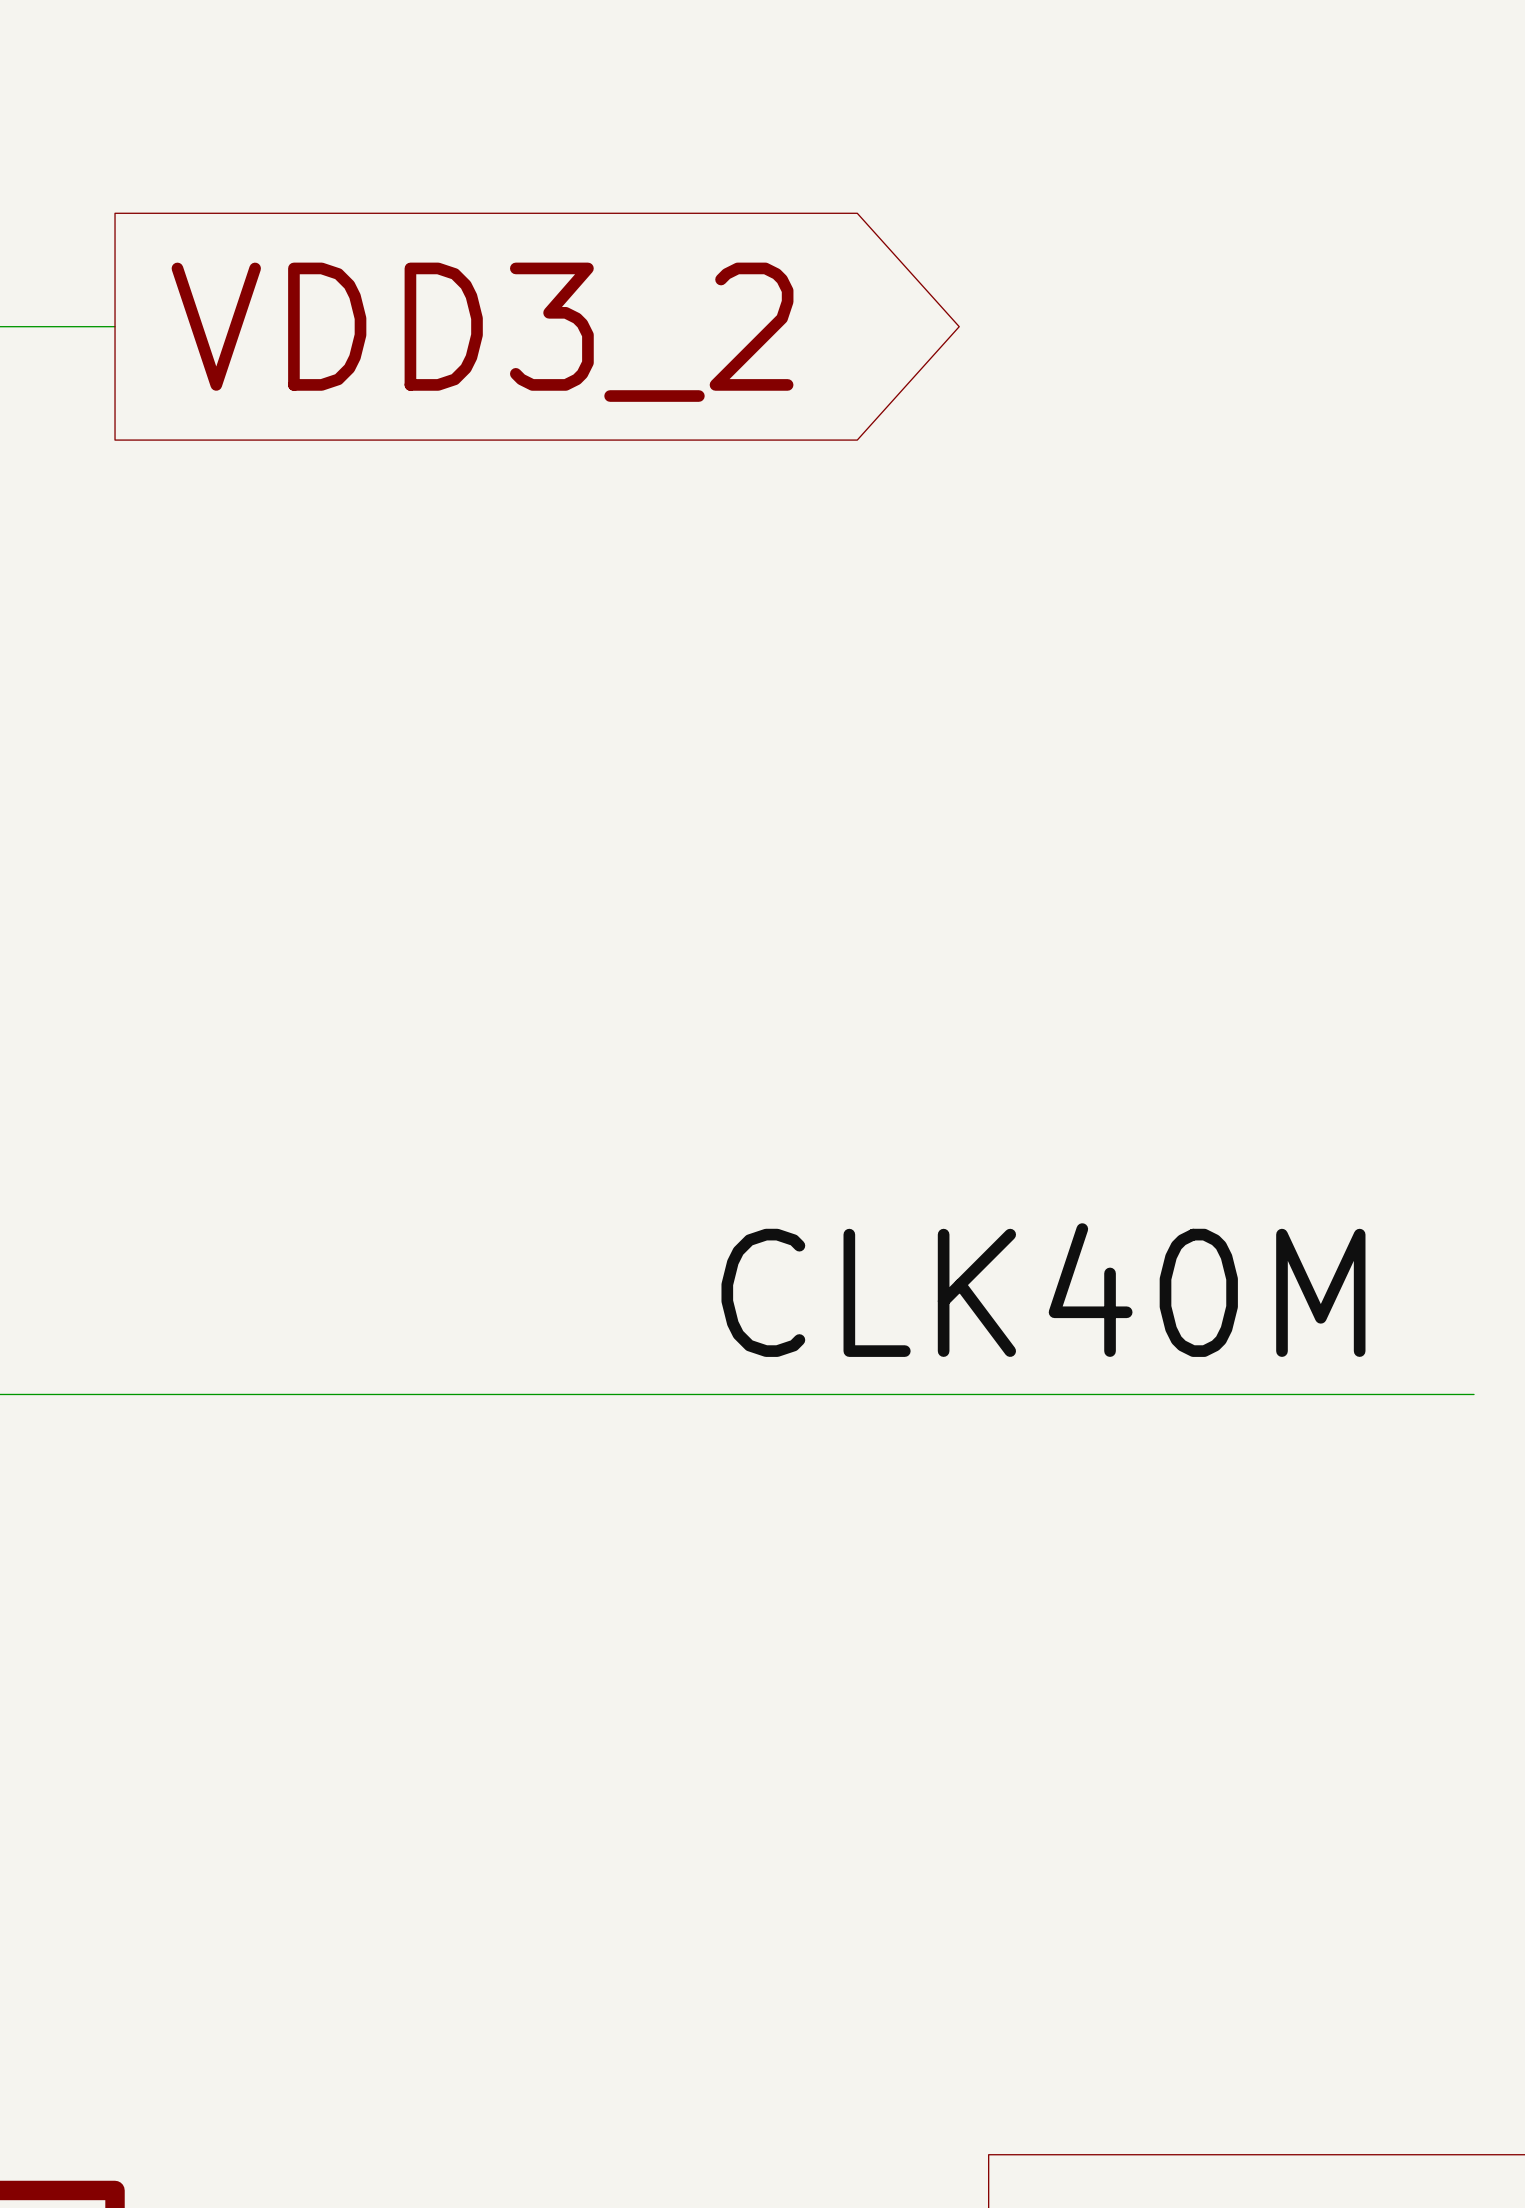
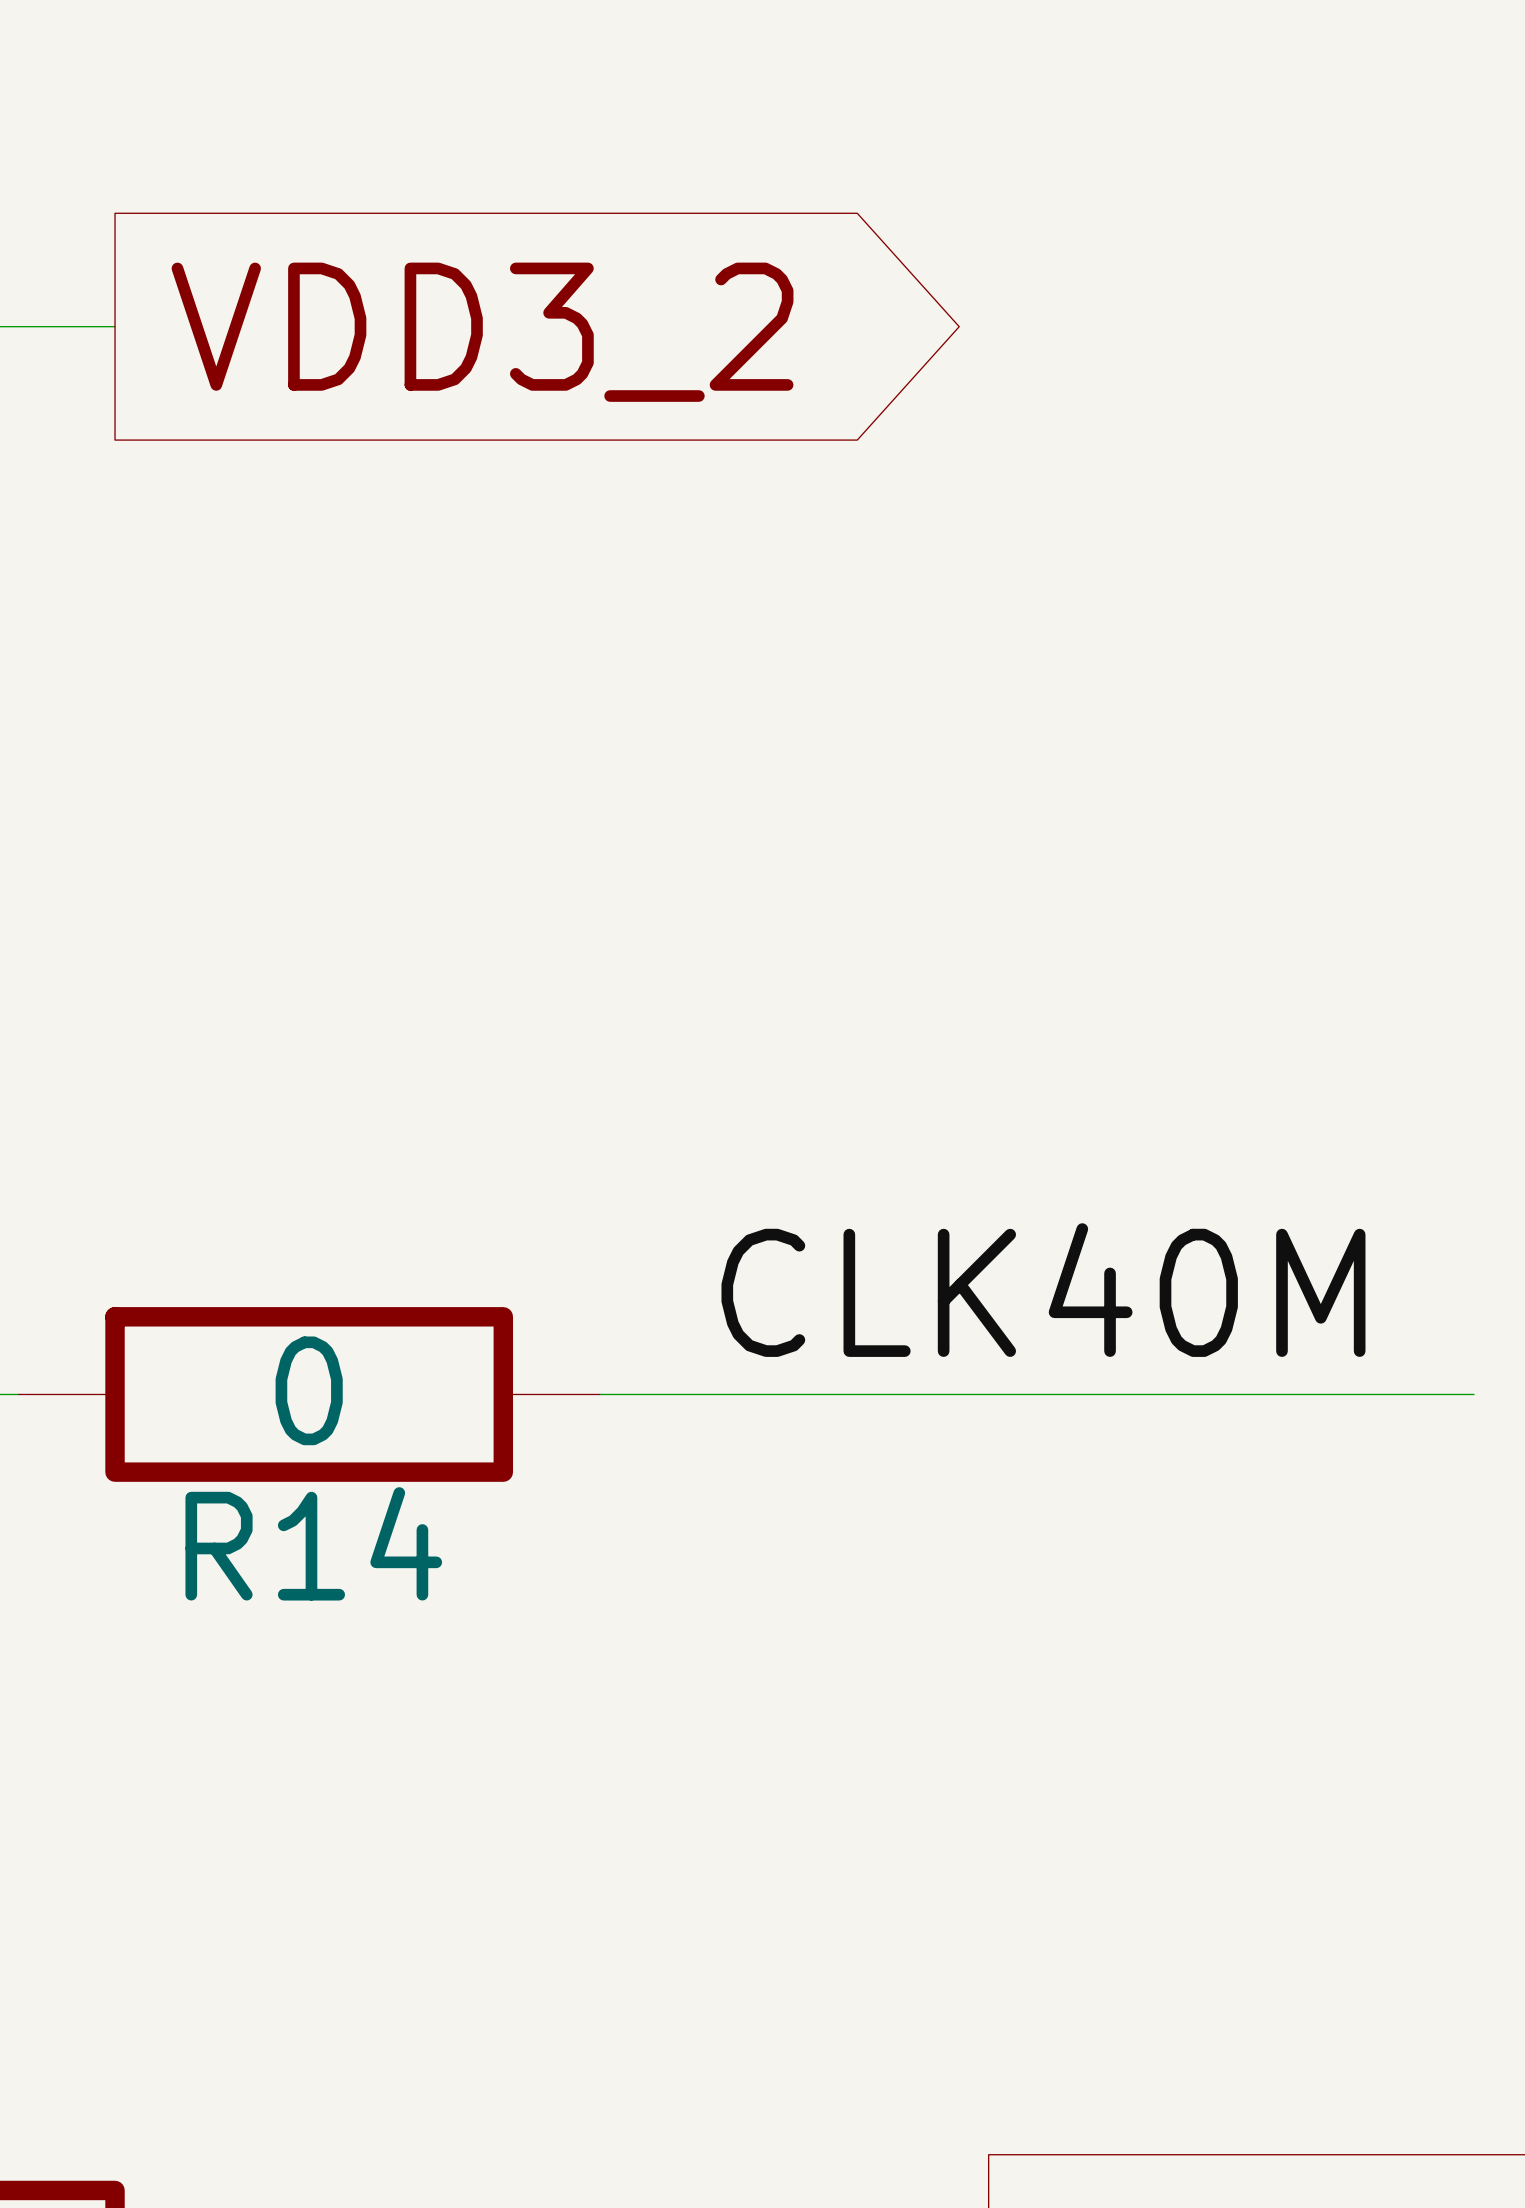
wire: (17, 1394) (600, 1394) -> none
R14: none -> 0 (309, 1394)

